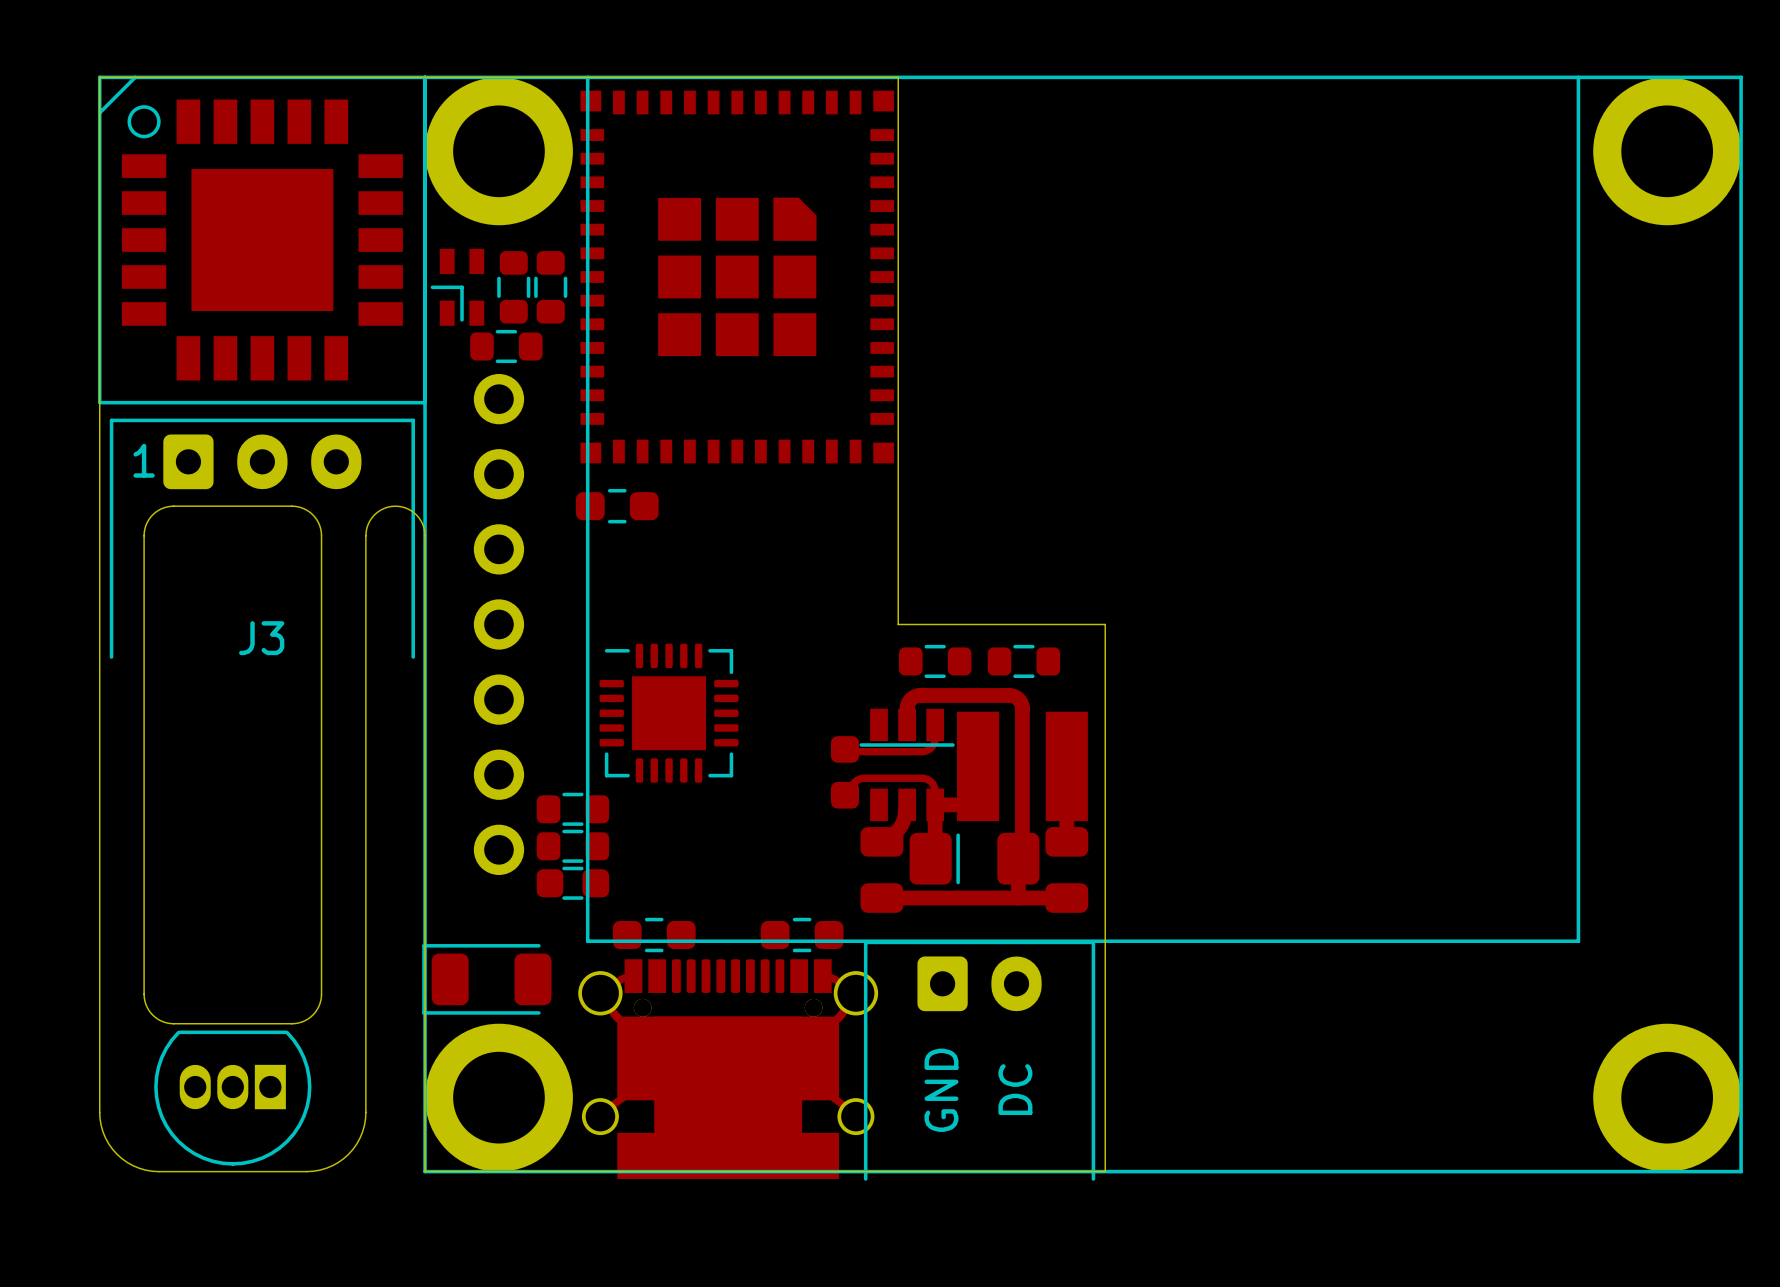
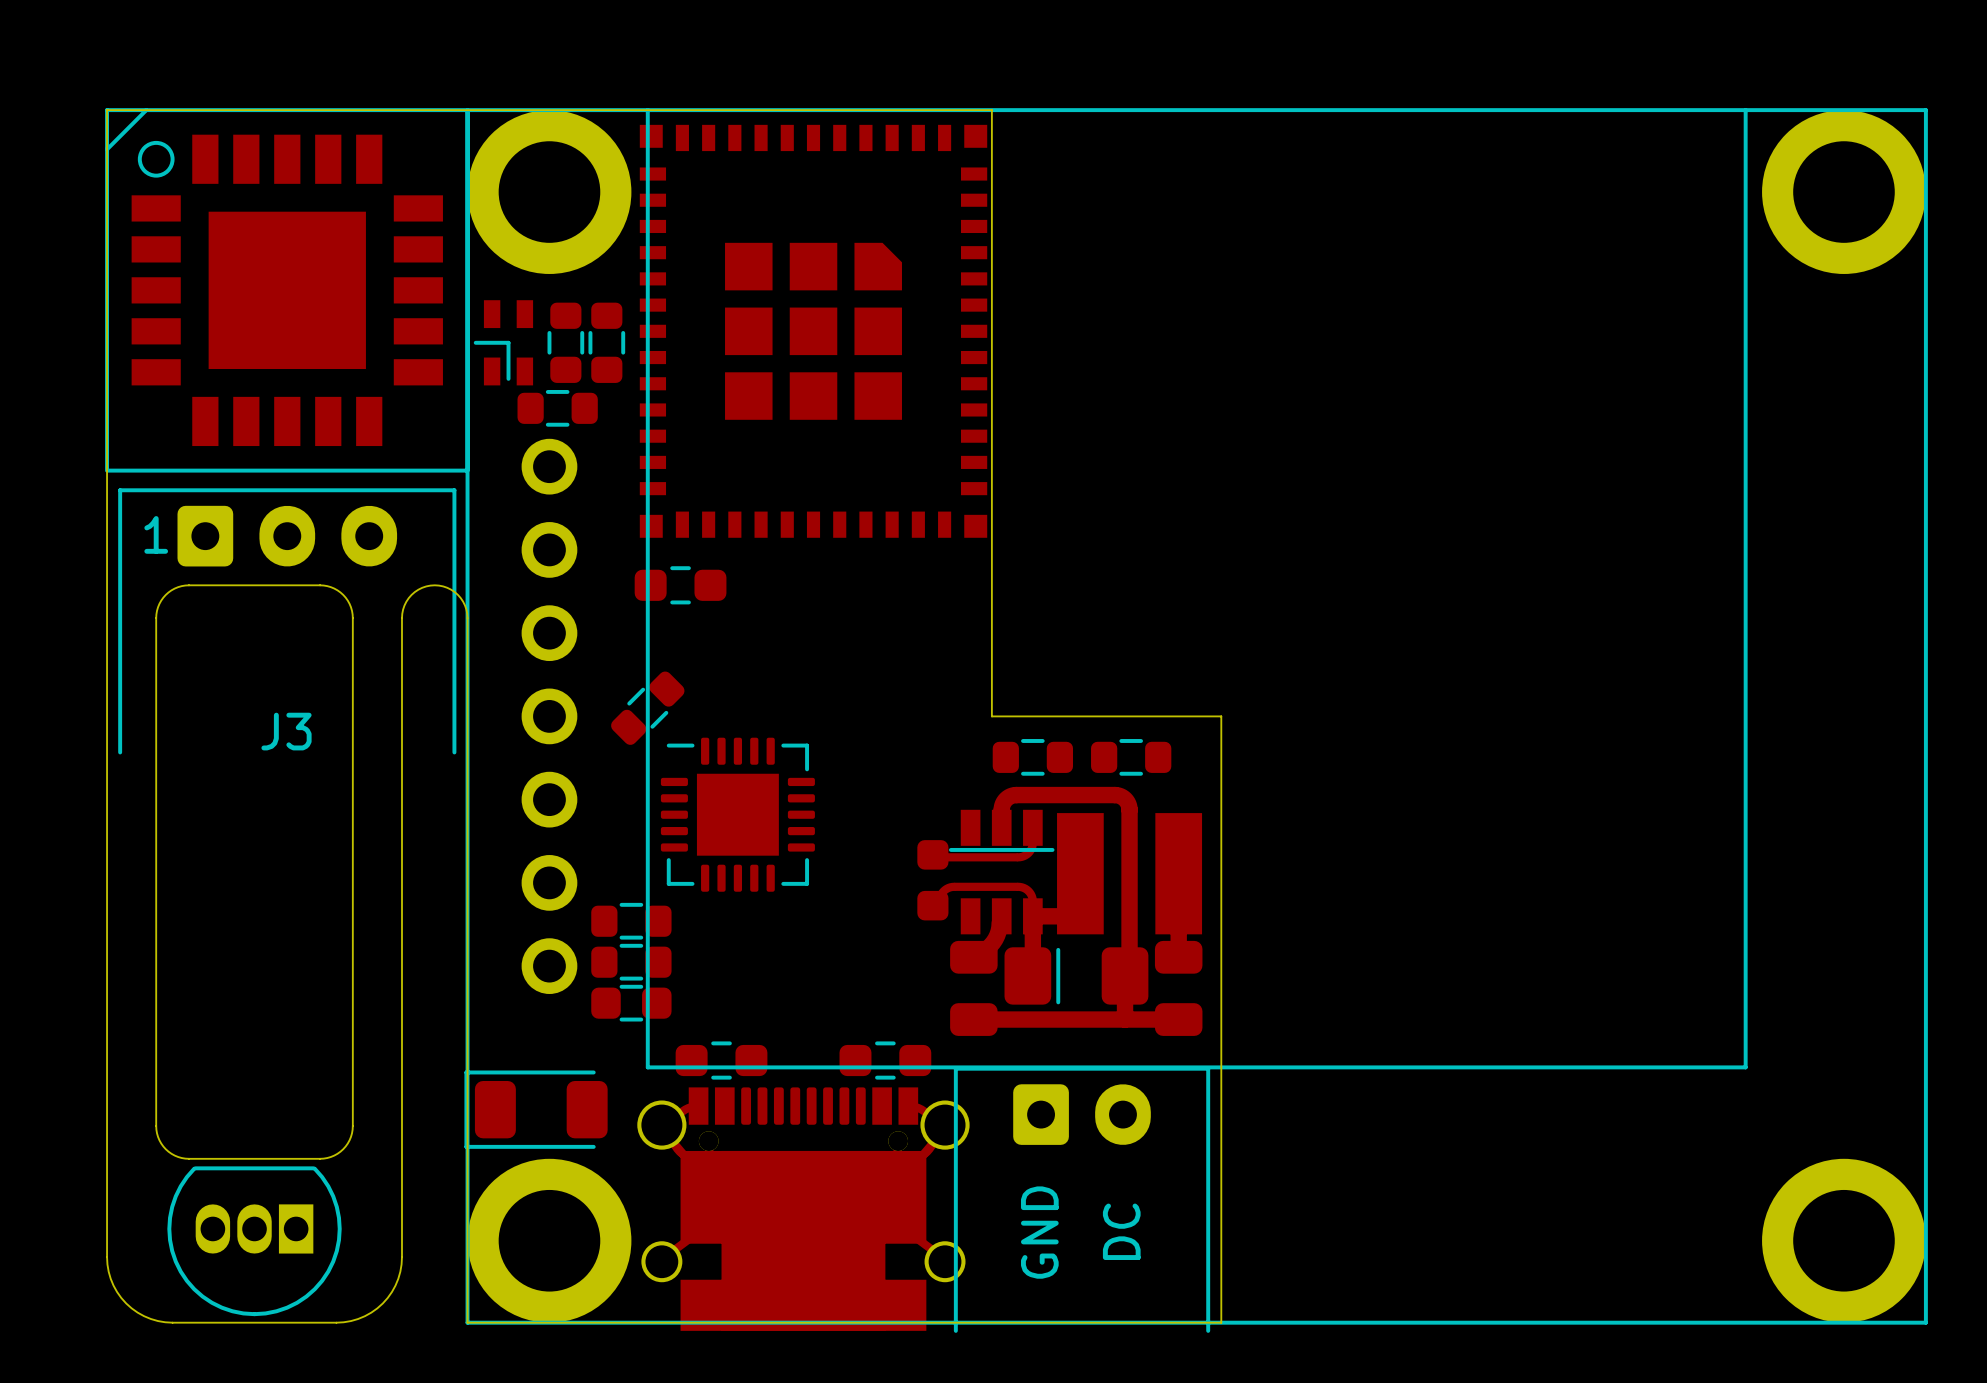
part footprint: [580, 90, 894, 464] -> [639, 124, 988, 538]
part: none -> (647, 708)

